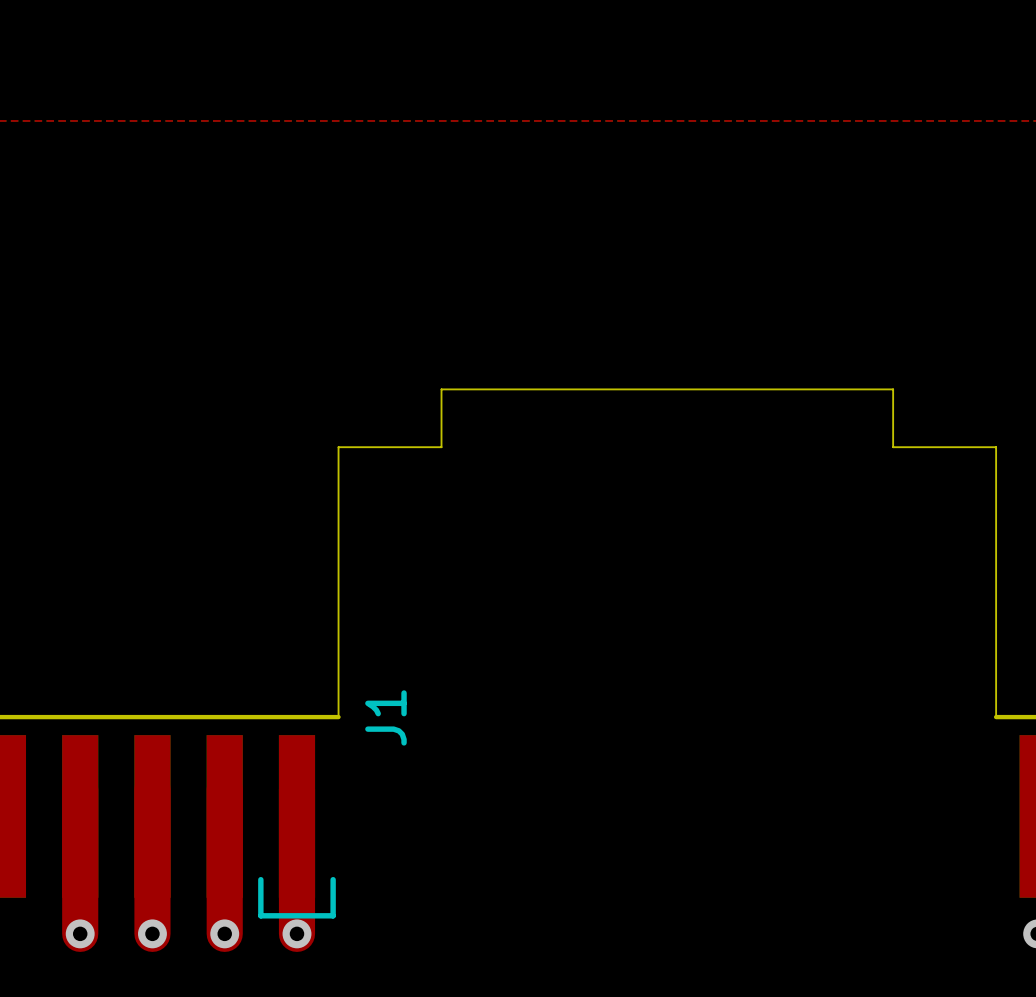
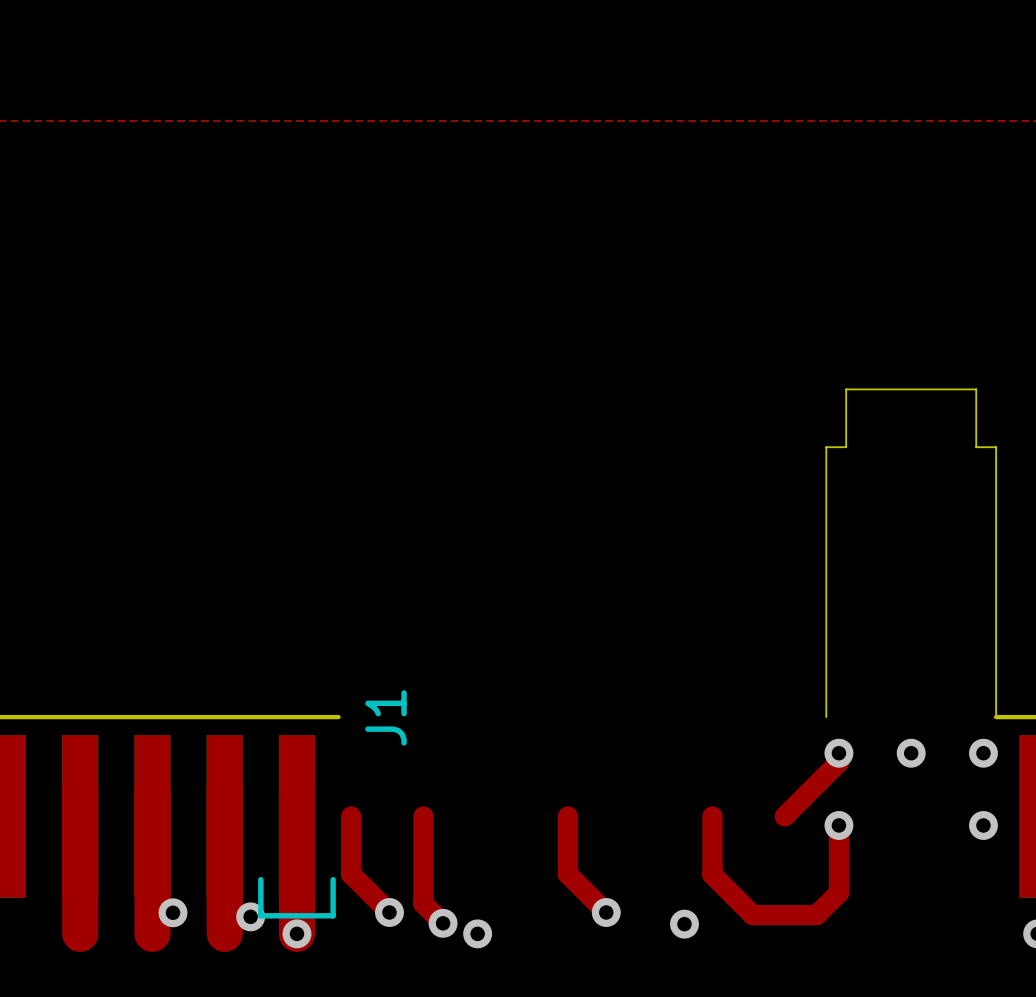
board edge: (846, 389) (441, 389) (441, 447) (338, 447) (338, 717) -> (846, 389) (846, 447) (826, 447) (826, 717)
board edge: (893, 389) (893, 447) (976, 447) -> (893, 389) (976, 389) (976, 447)
top track: none -> (838, 753) (838, 762) (784, 816)
via: none -> (838, 753)
via: none -> (911, 753)
via: none -> (983, 753)
top track: none -> (351, 816) (351, 874) (389, 912)
top track: none -> (423, 816) (423, 903) (443, 923)
top track: none -> (567, 816) (567, 874) (606, 912)
top track: none -> (712, 816) (712, 874) (752, 915) (816, 915) (838, 892) (838, 825)
via: none -> (838, 825)
via: none -> (983, 825)
via: none -> (389, 912)
via: none -> (606, 912)
via: none -> (443, 923)
via: none -> (684, 924)
via: (80, 933) -> none
via position: (152, 933) -> (173, 912)
via position: (224, 933) -> (250, 916)
via: none -> (477, 933)

